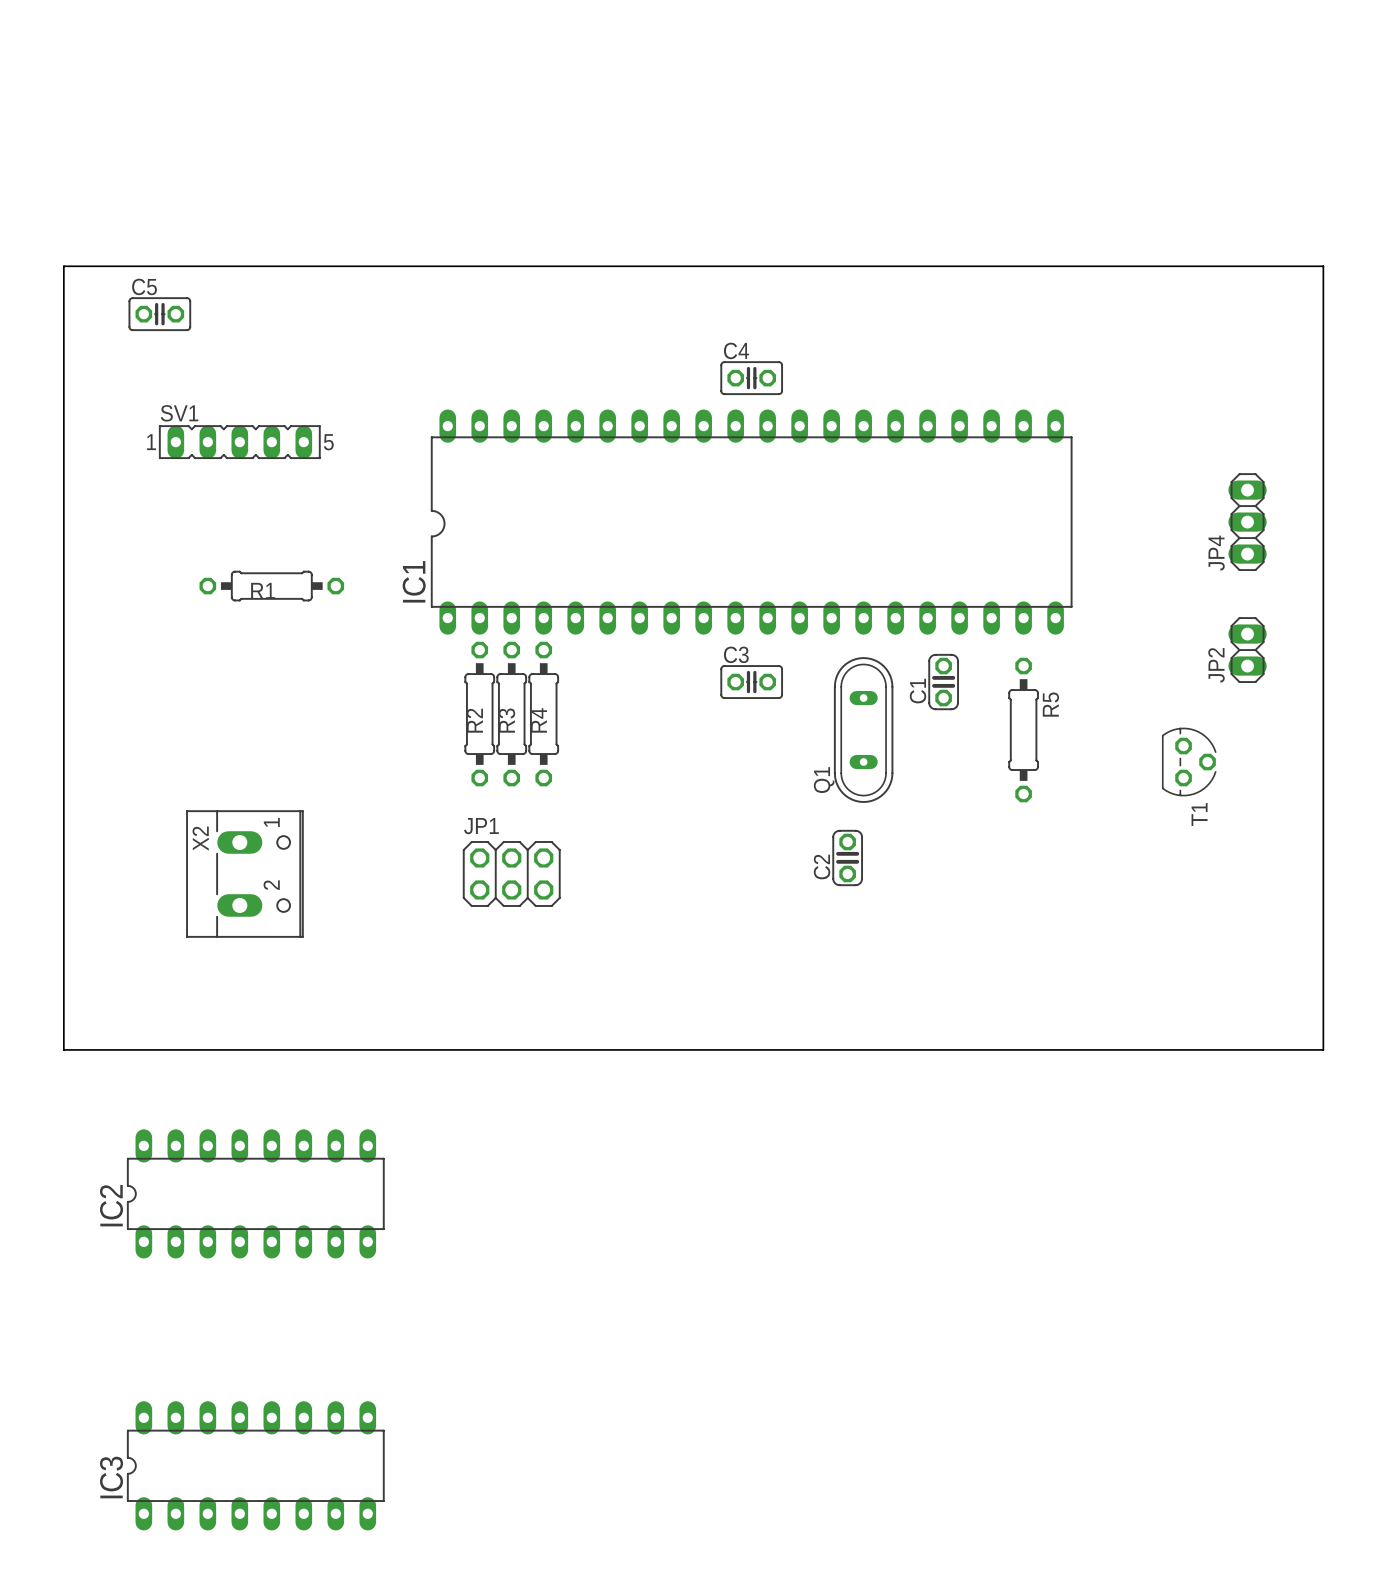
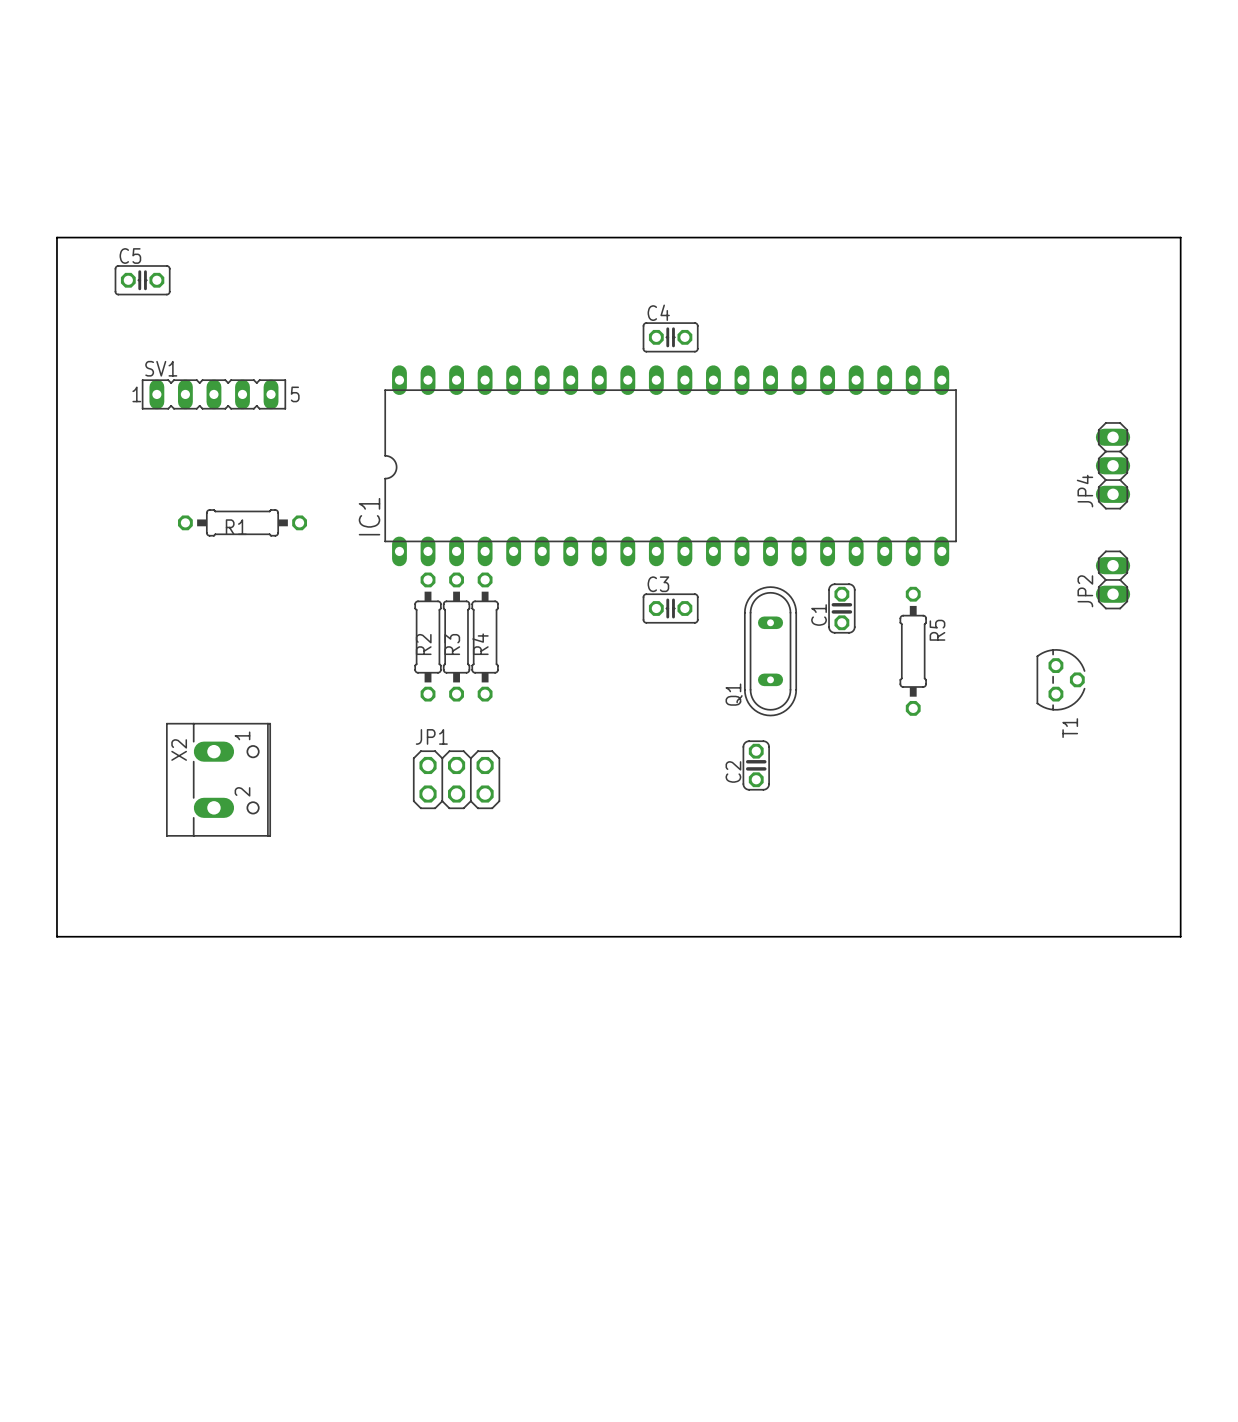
IC2: (255, 1193) -> none
IC3: (255, 1465) -> none

